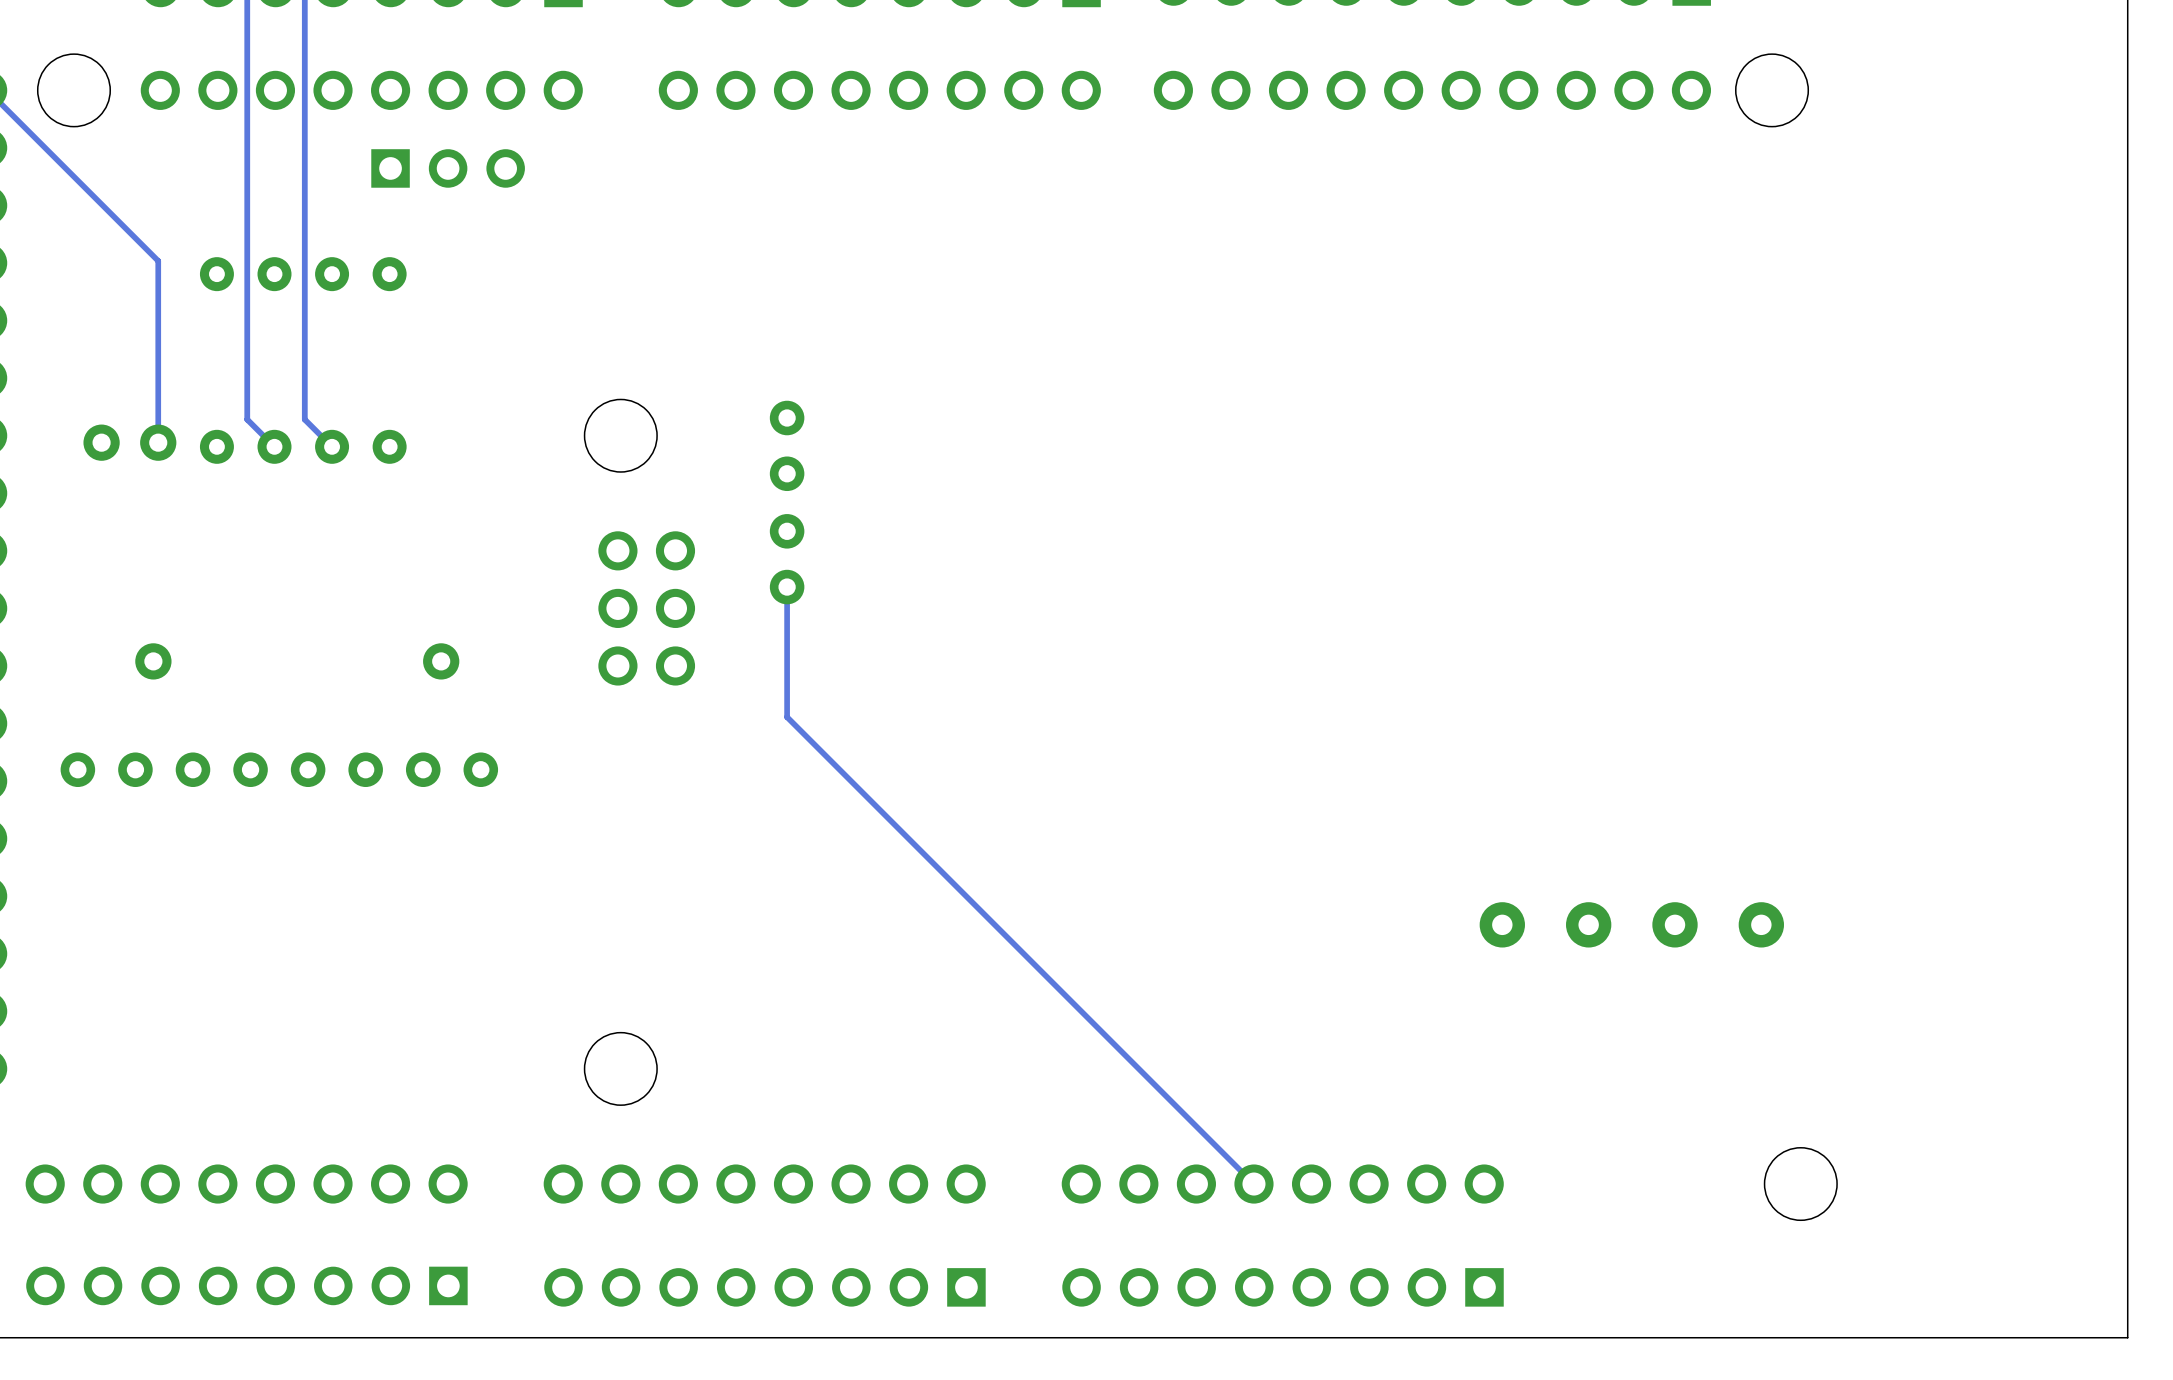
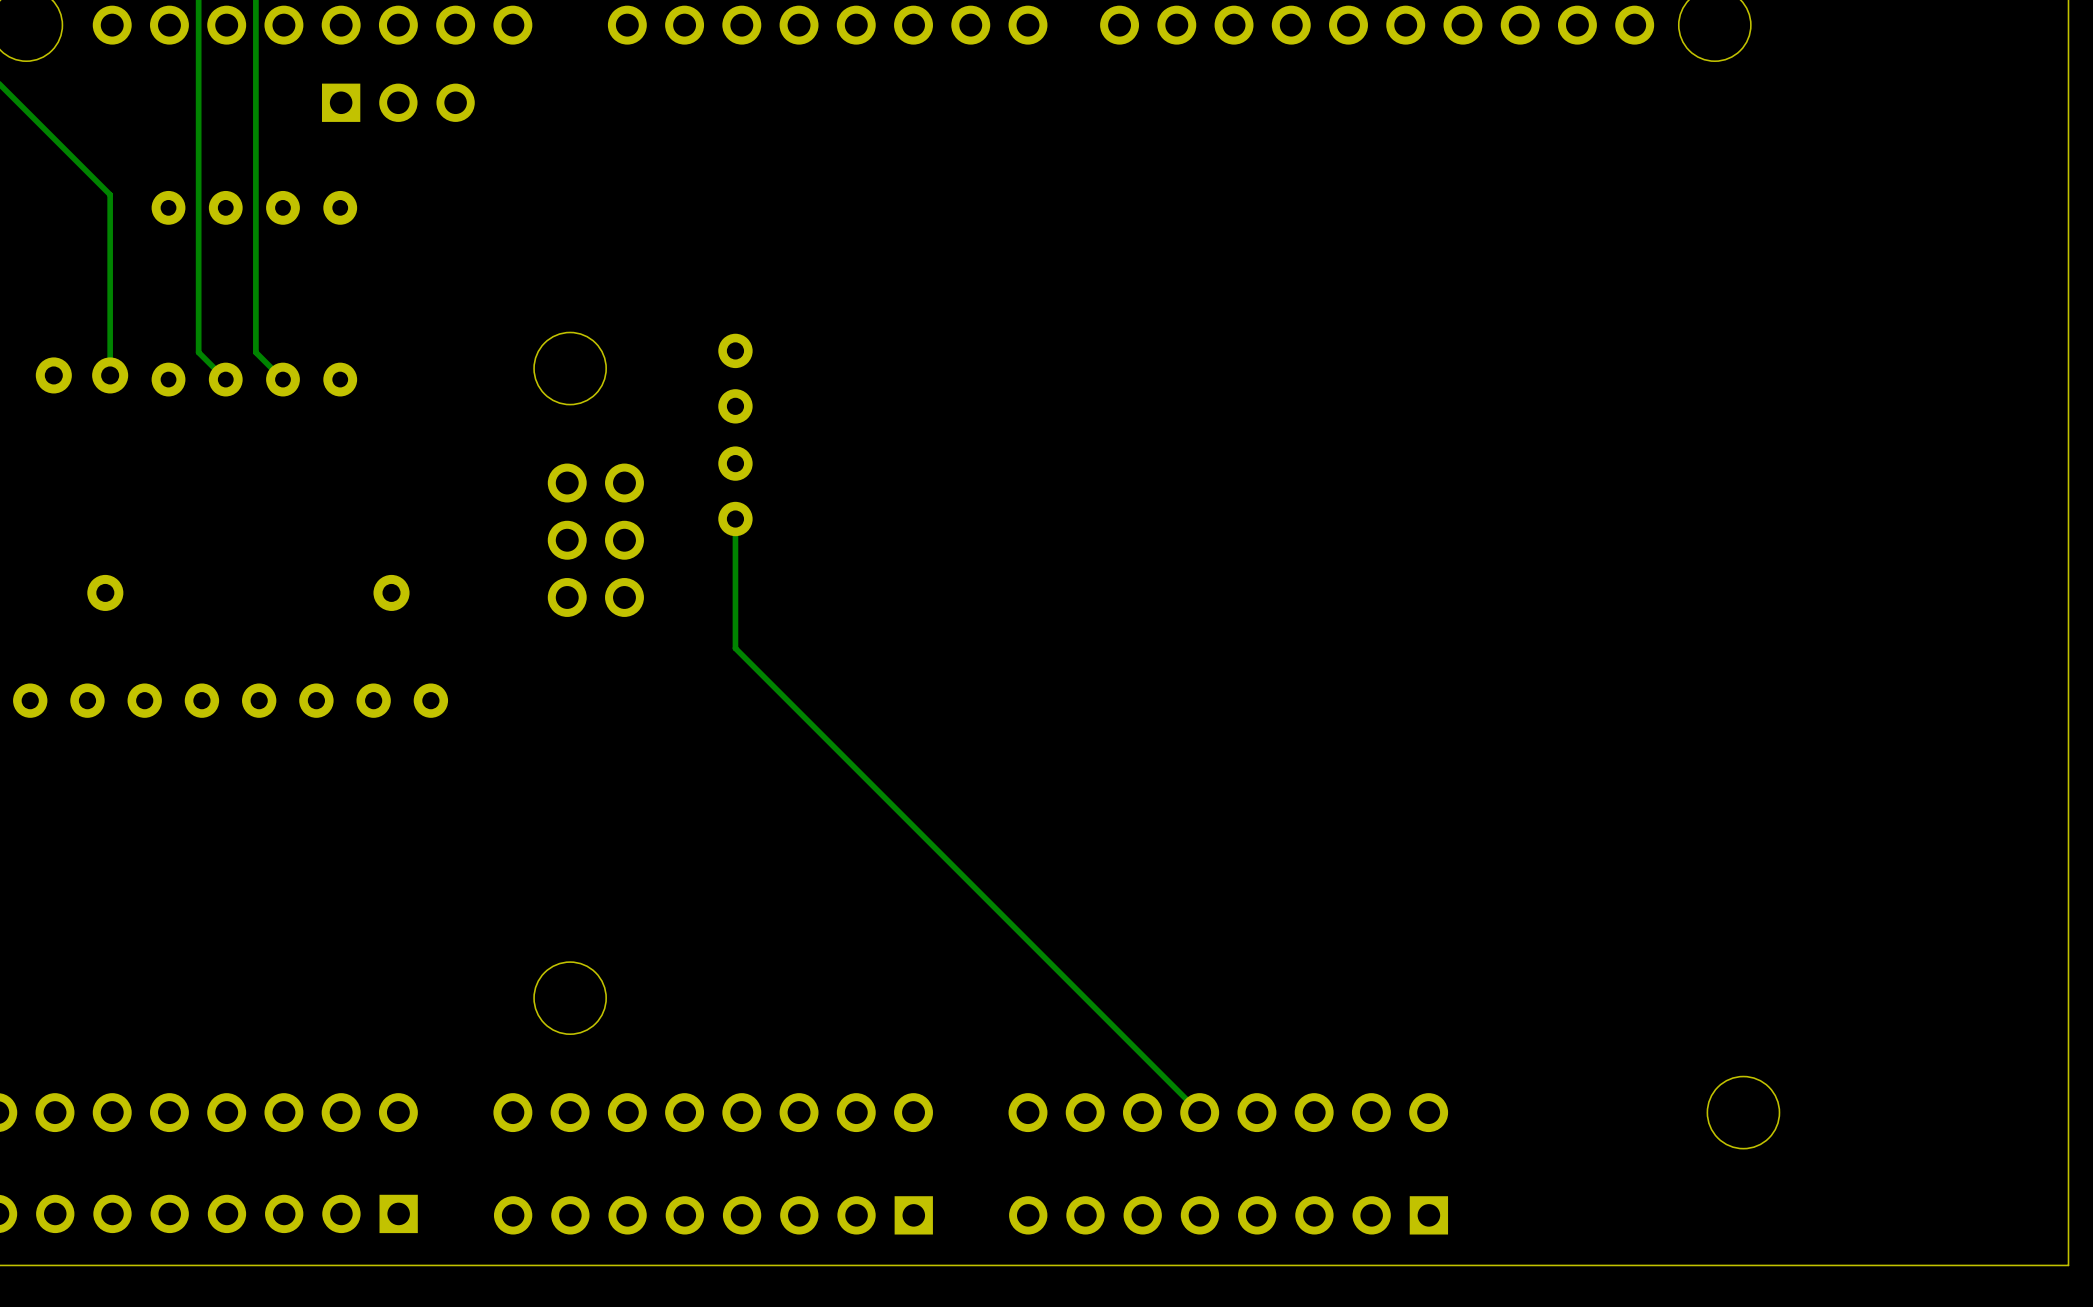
part: (1631, 924) -> none

